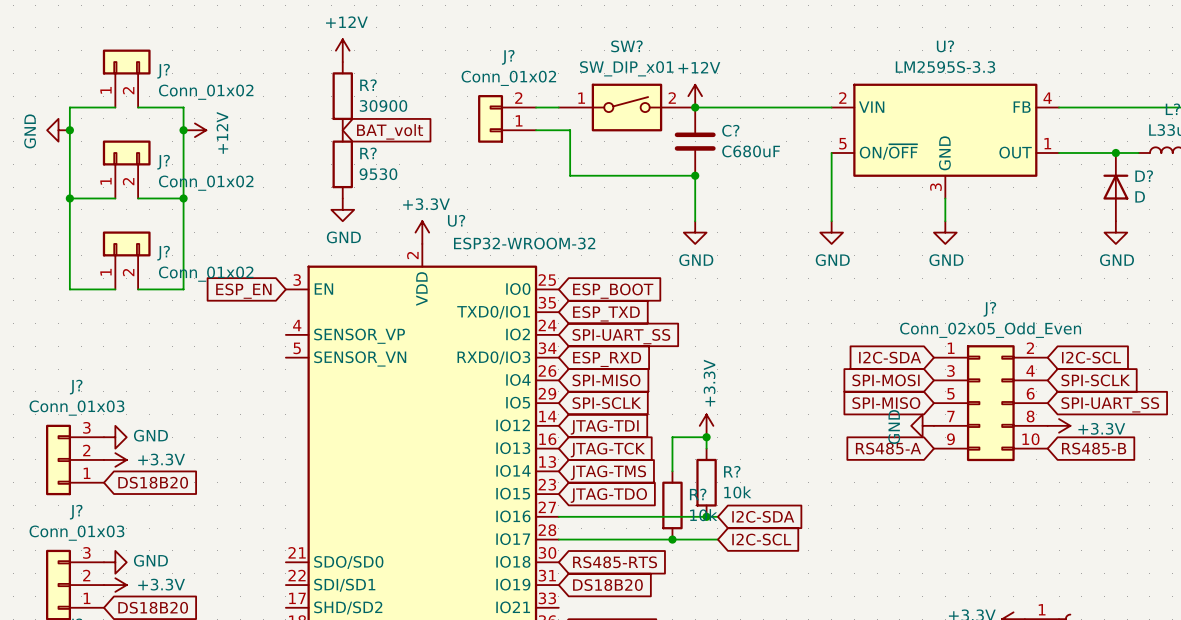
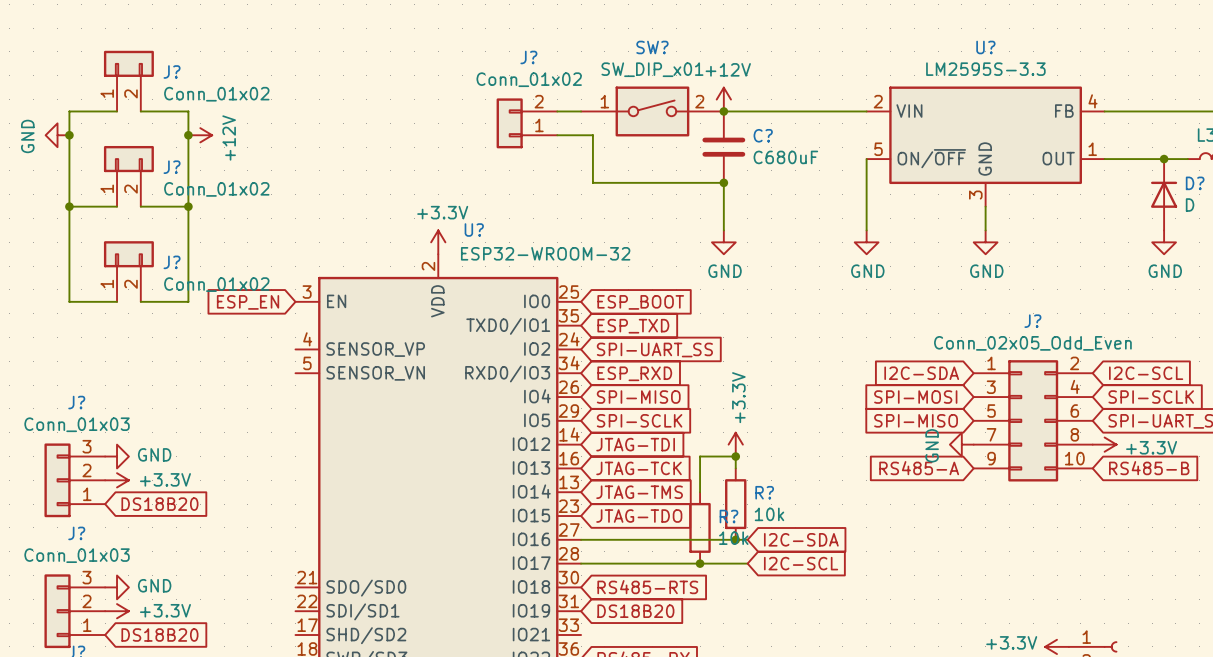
power symbol: +12V (342, 50) -> none
R?: 30900 (342, 96) -> none
global label: BAT_volt (390, 131) -> none
R?: 9530 (342, 164) -> none
power symbol: GND (342, 209) -> none

